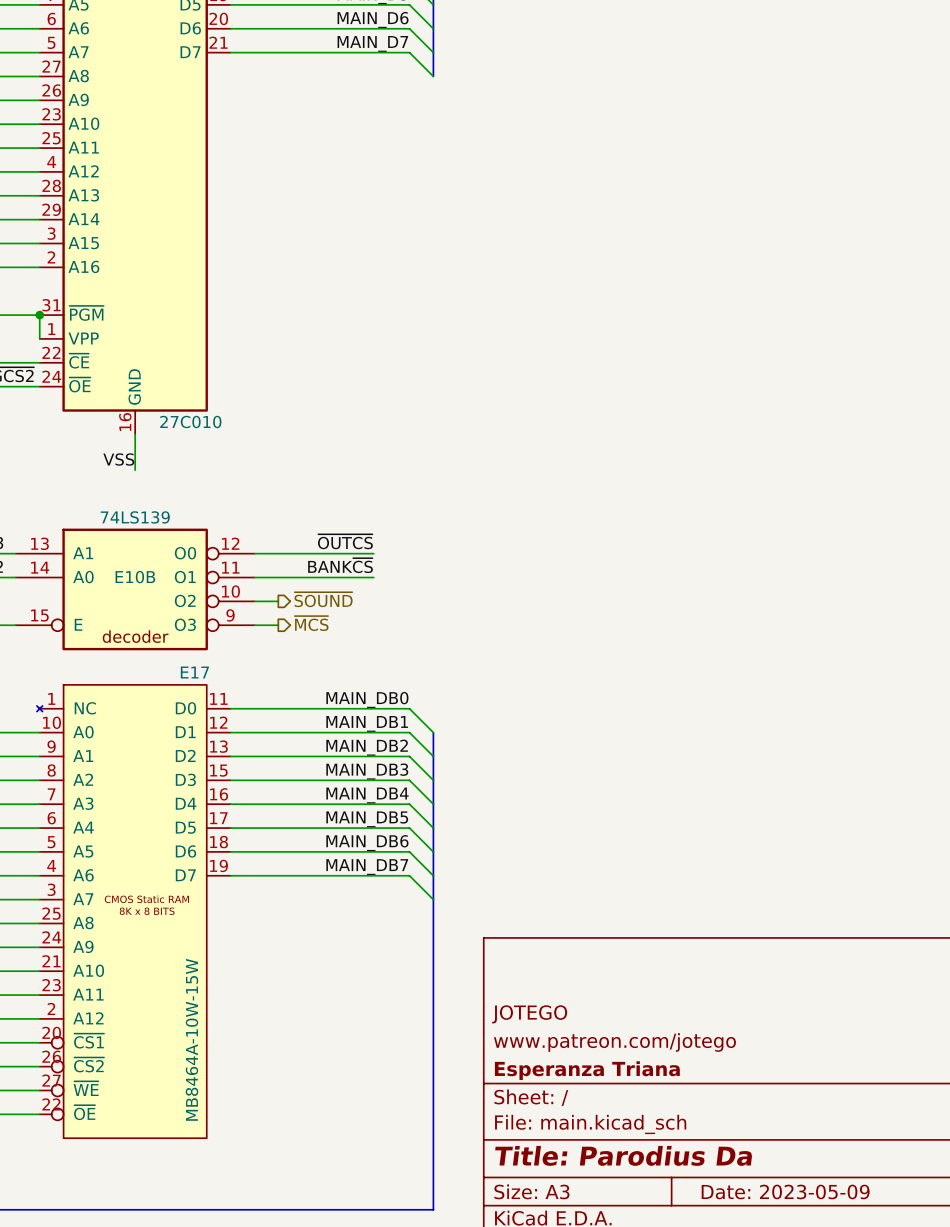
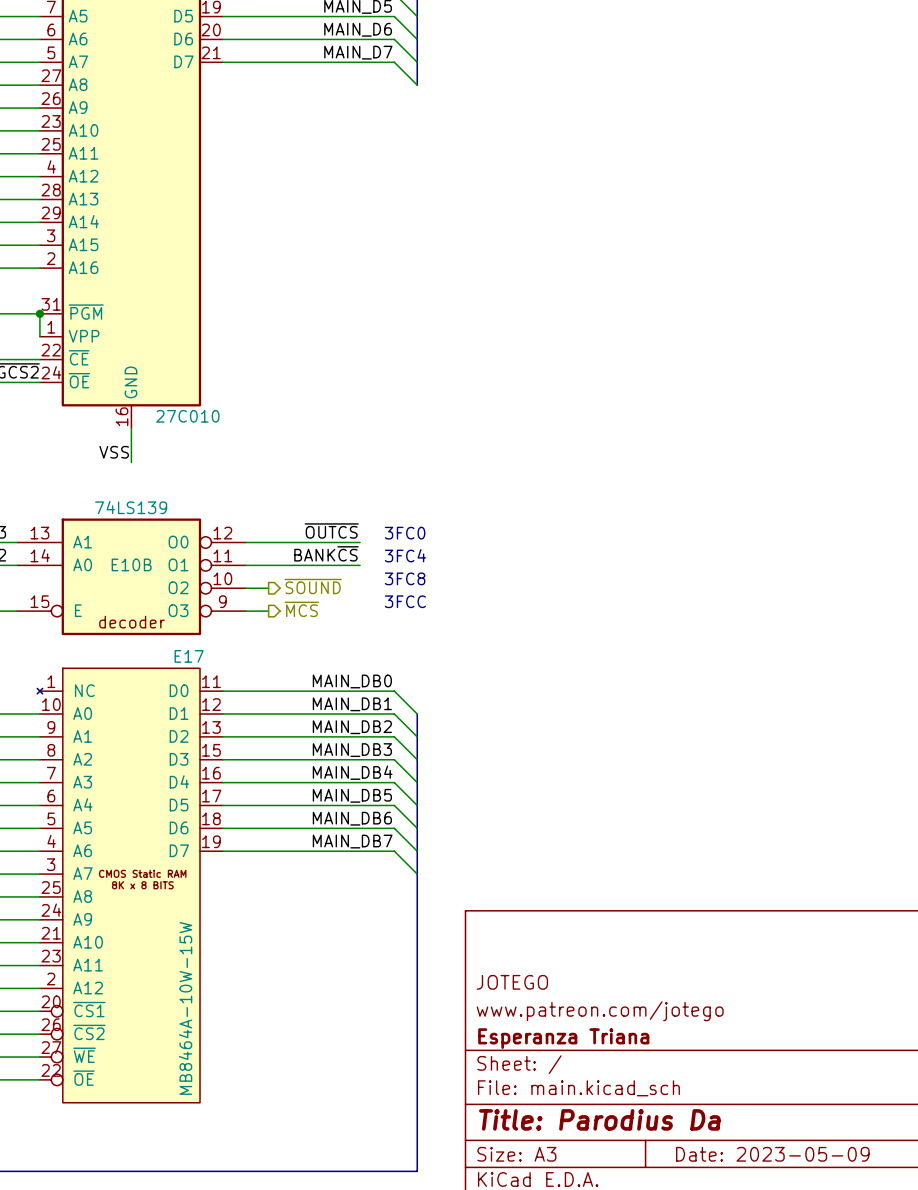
text: none -> 3FC0 (405, 533)
text: none -> 3FC4 (405, 555)
text: none -> 3FC8 (405, 578)
text: none -> 3FCC (405, 601)

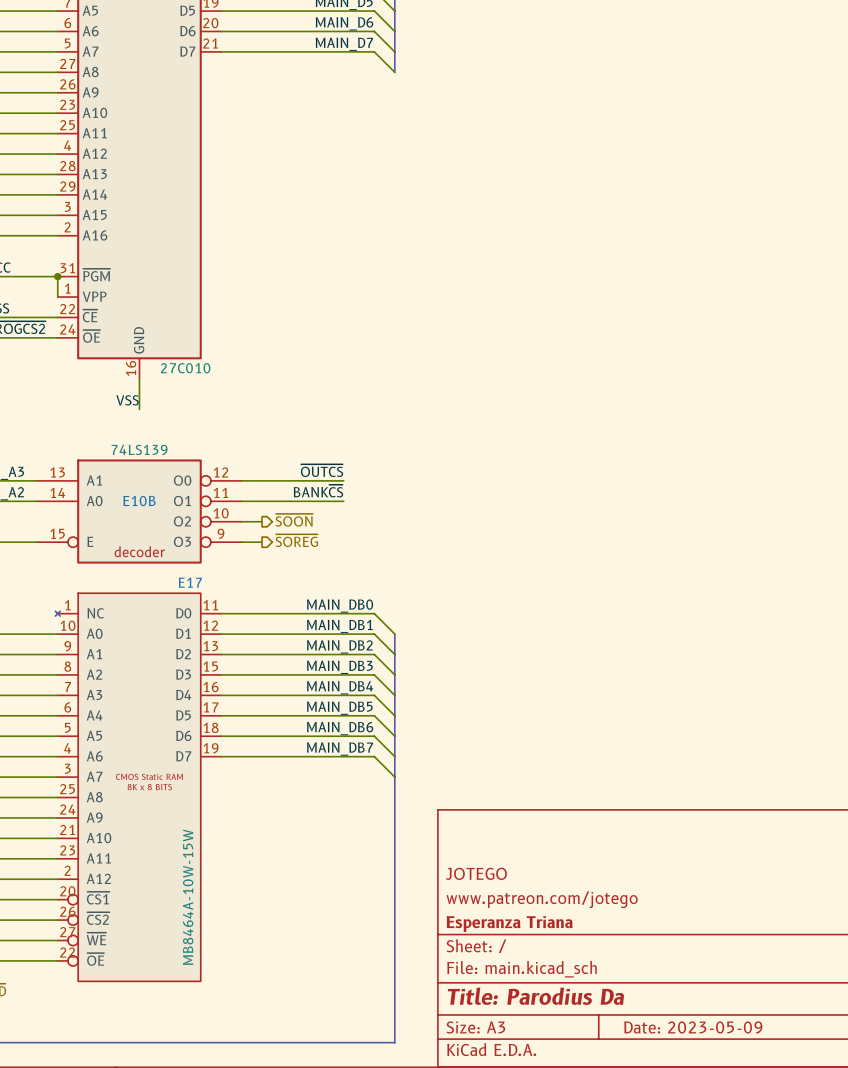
text: 3FC0 (405, 533) -> none
text: 3FC4 (405, 555) -> none
text: 3FC8 (405, 578) -> none
hierarchical label: ~{SOUND} (313, 586) -> ~{SOON} (294, 520)
text: 3FCC (405, 601) -> none
hierarchical label: ~{MCS} (301, 609) -> ~{SOREG} (296, 540)

